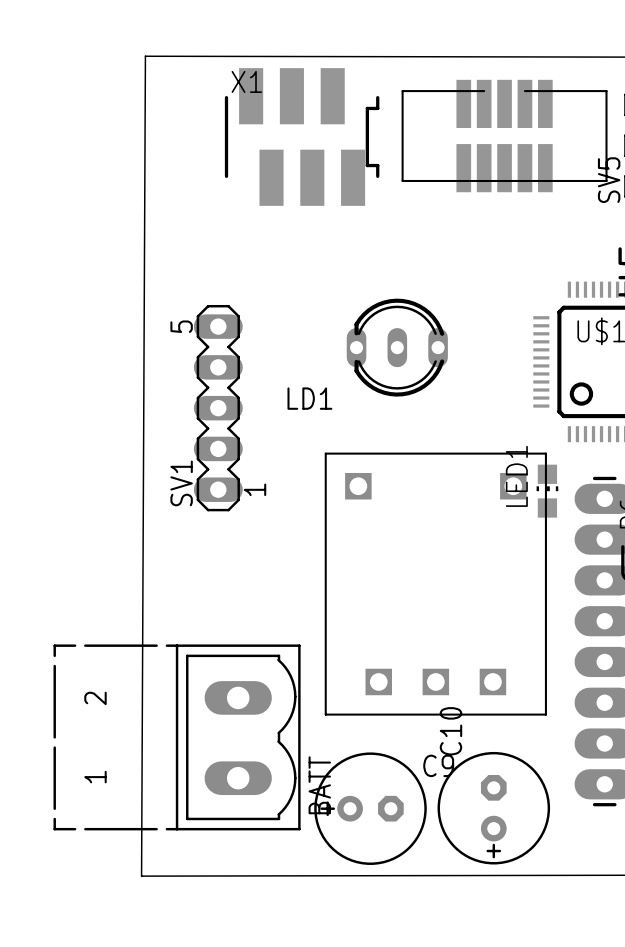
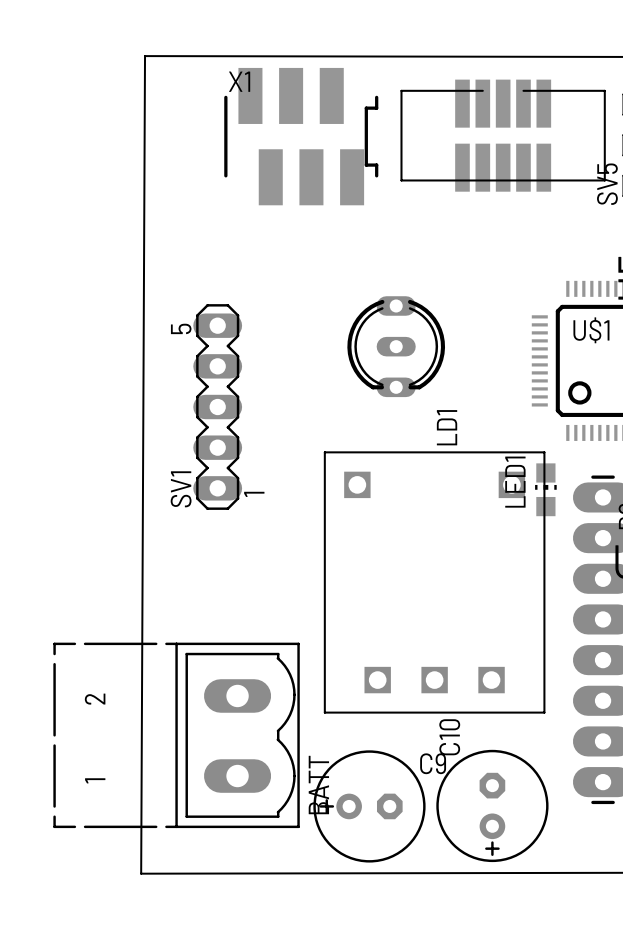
LD1 rotation: 0° (397, 347) -> 90° counterclockwise (396, 346)

